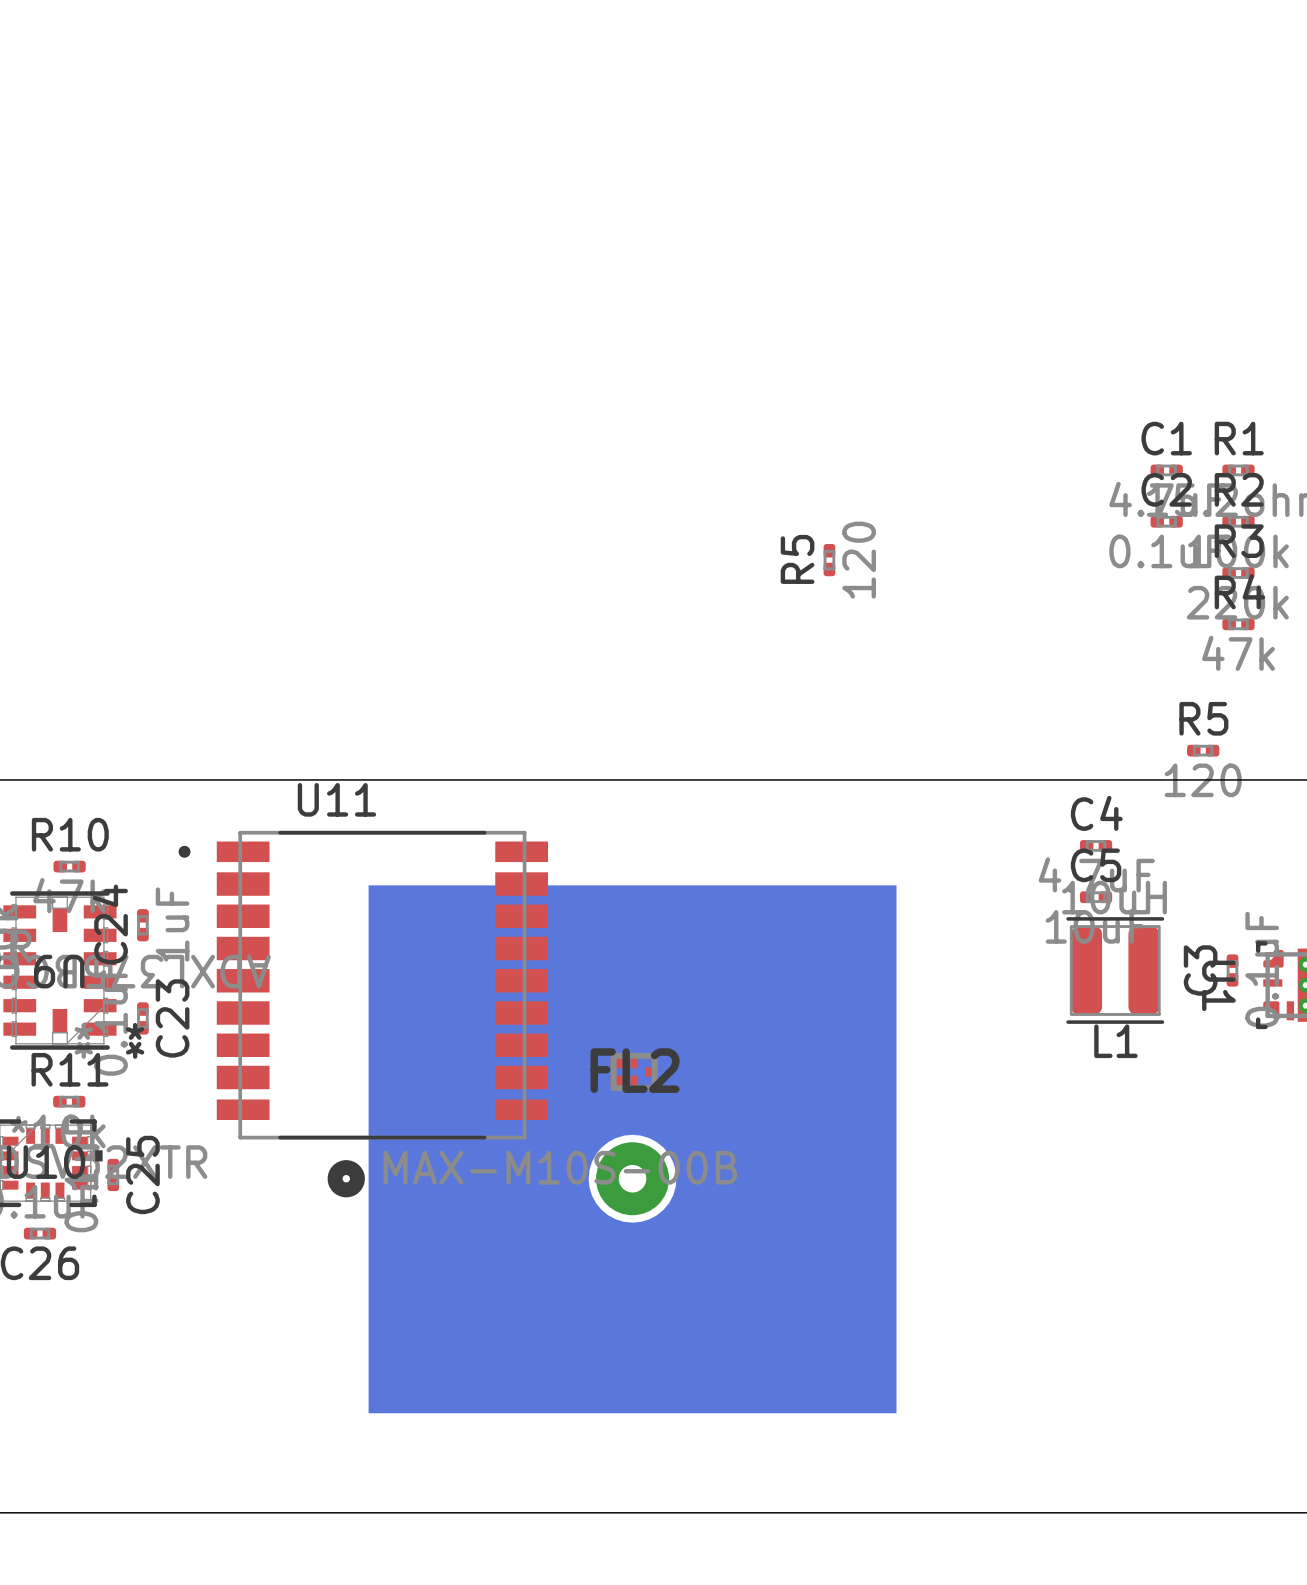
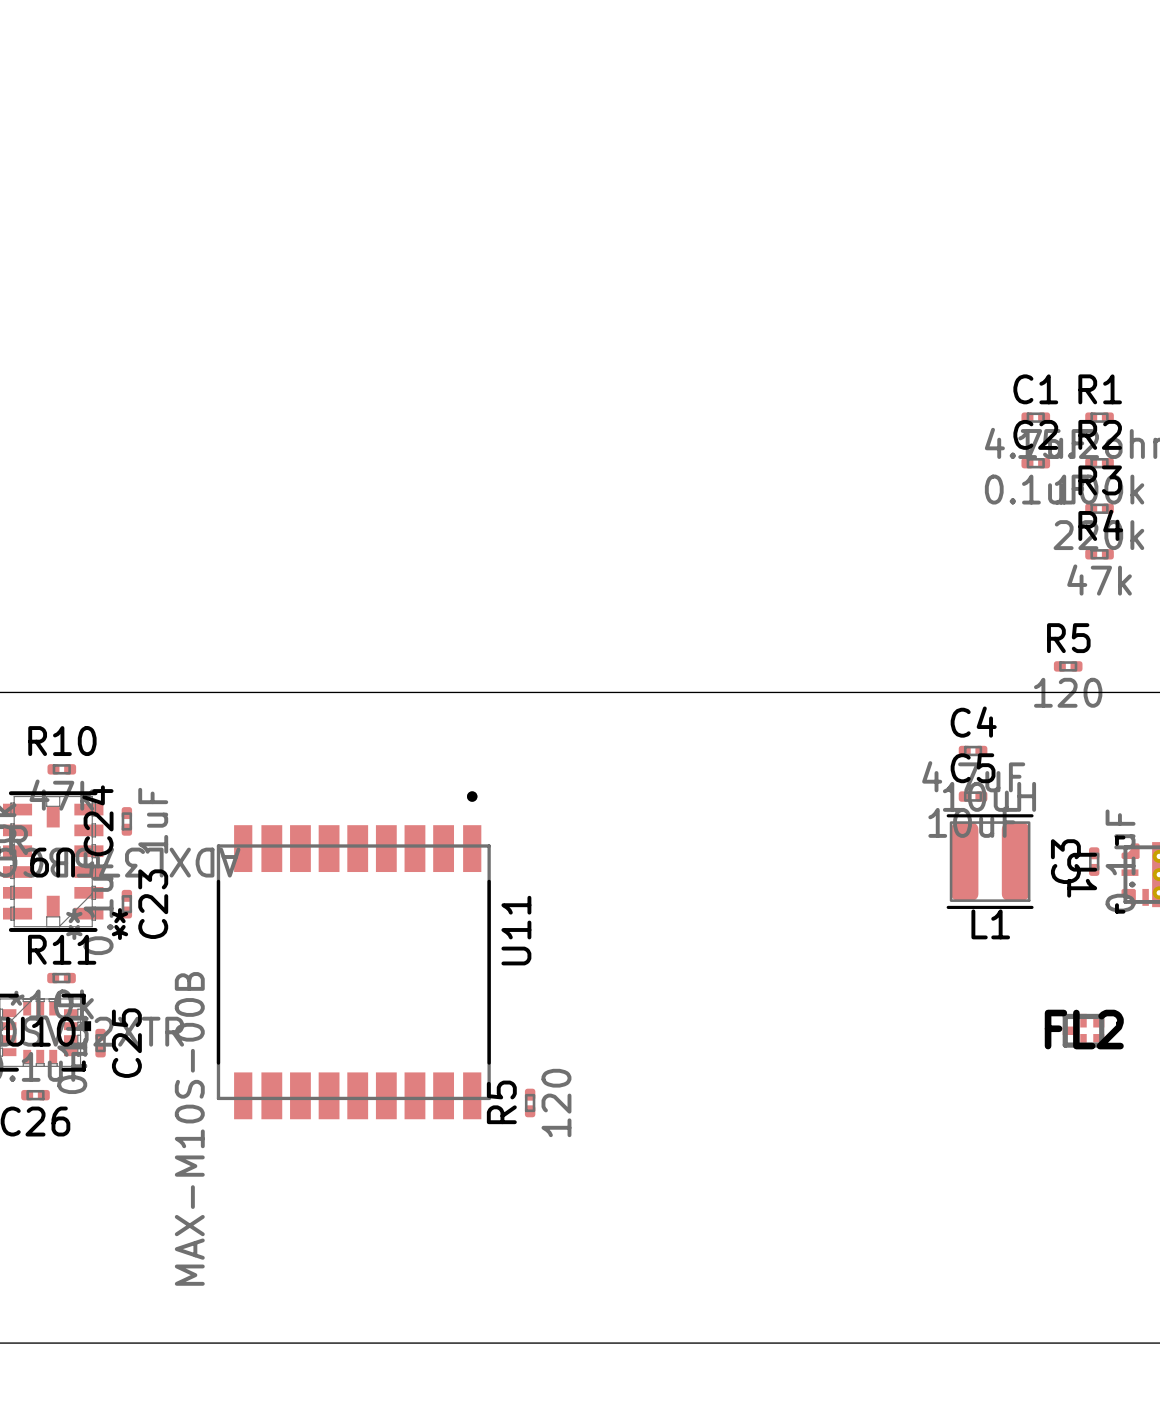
R5 position: (829, 560) -> (530, 1102)
U11 rotation: 0° (363, 985) -> 90° clockwise (353, 955)
FL2 rotation: 0° (624, 1072) -> 180° (1091, 1030)
FL2 position: (624, 1072) -> (1091, 1030)
part: (612, 1149) -> none

